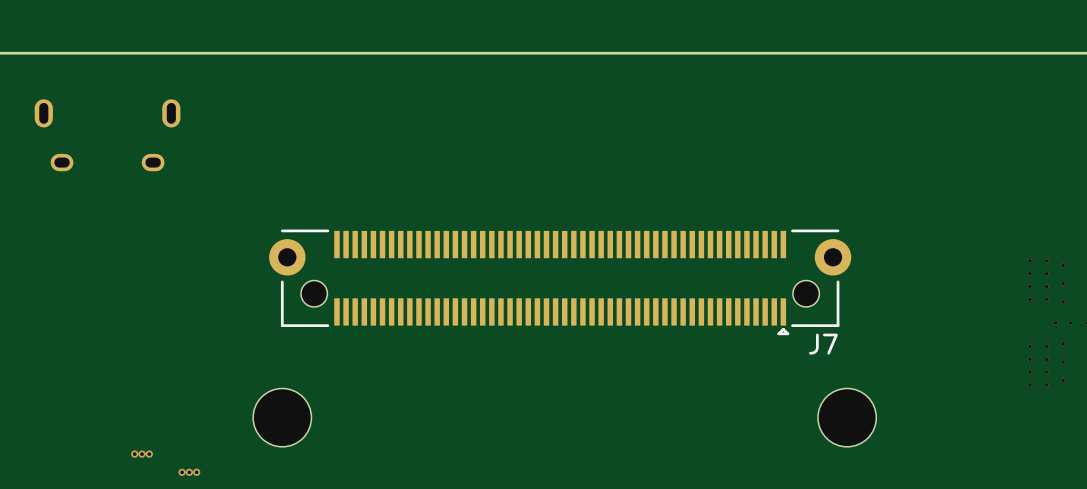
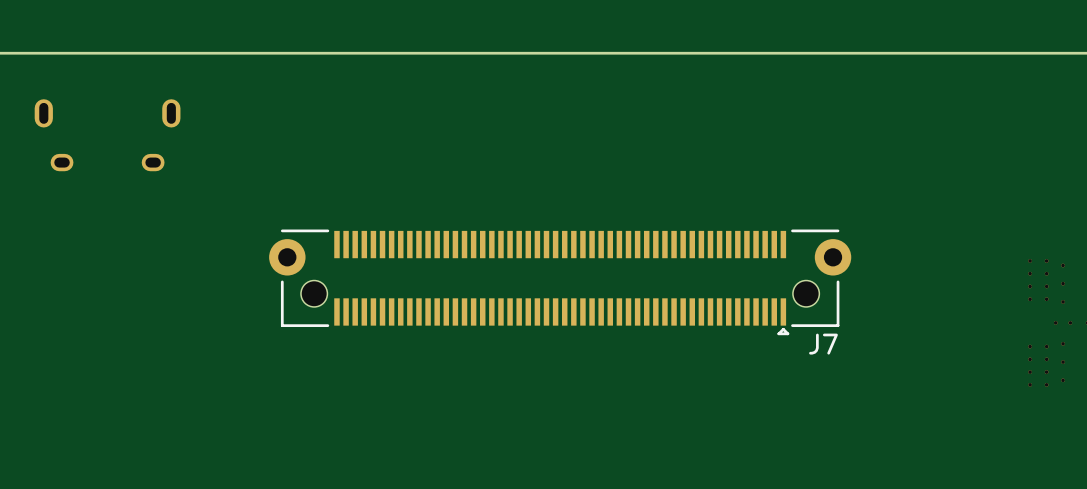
part: (282, 417) -> none
part: (847, 417) -> none
via: (134, 454) -> none
via: (142, 454) -> none
via: (149, 454) -> none
via: (182, 472) -> none
via: (189, 472) -> none
via: (196, 472) -> none

